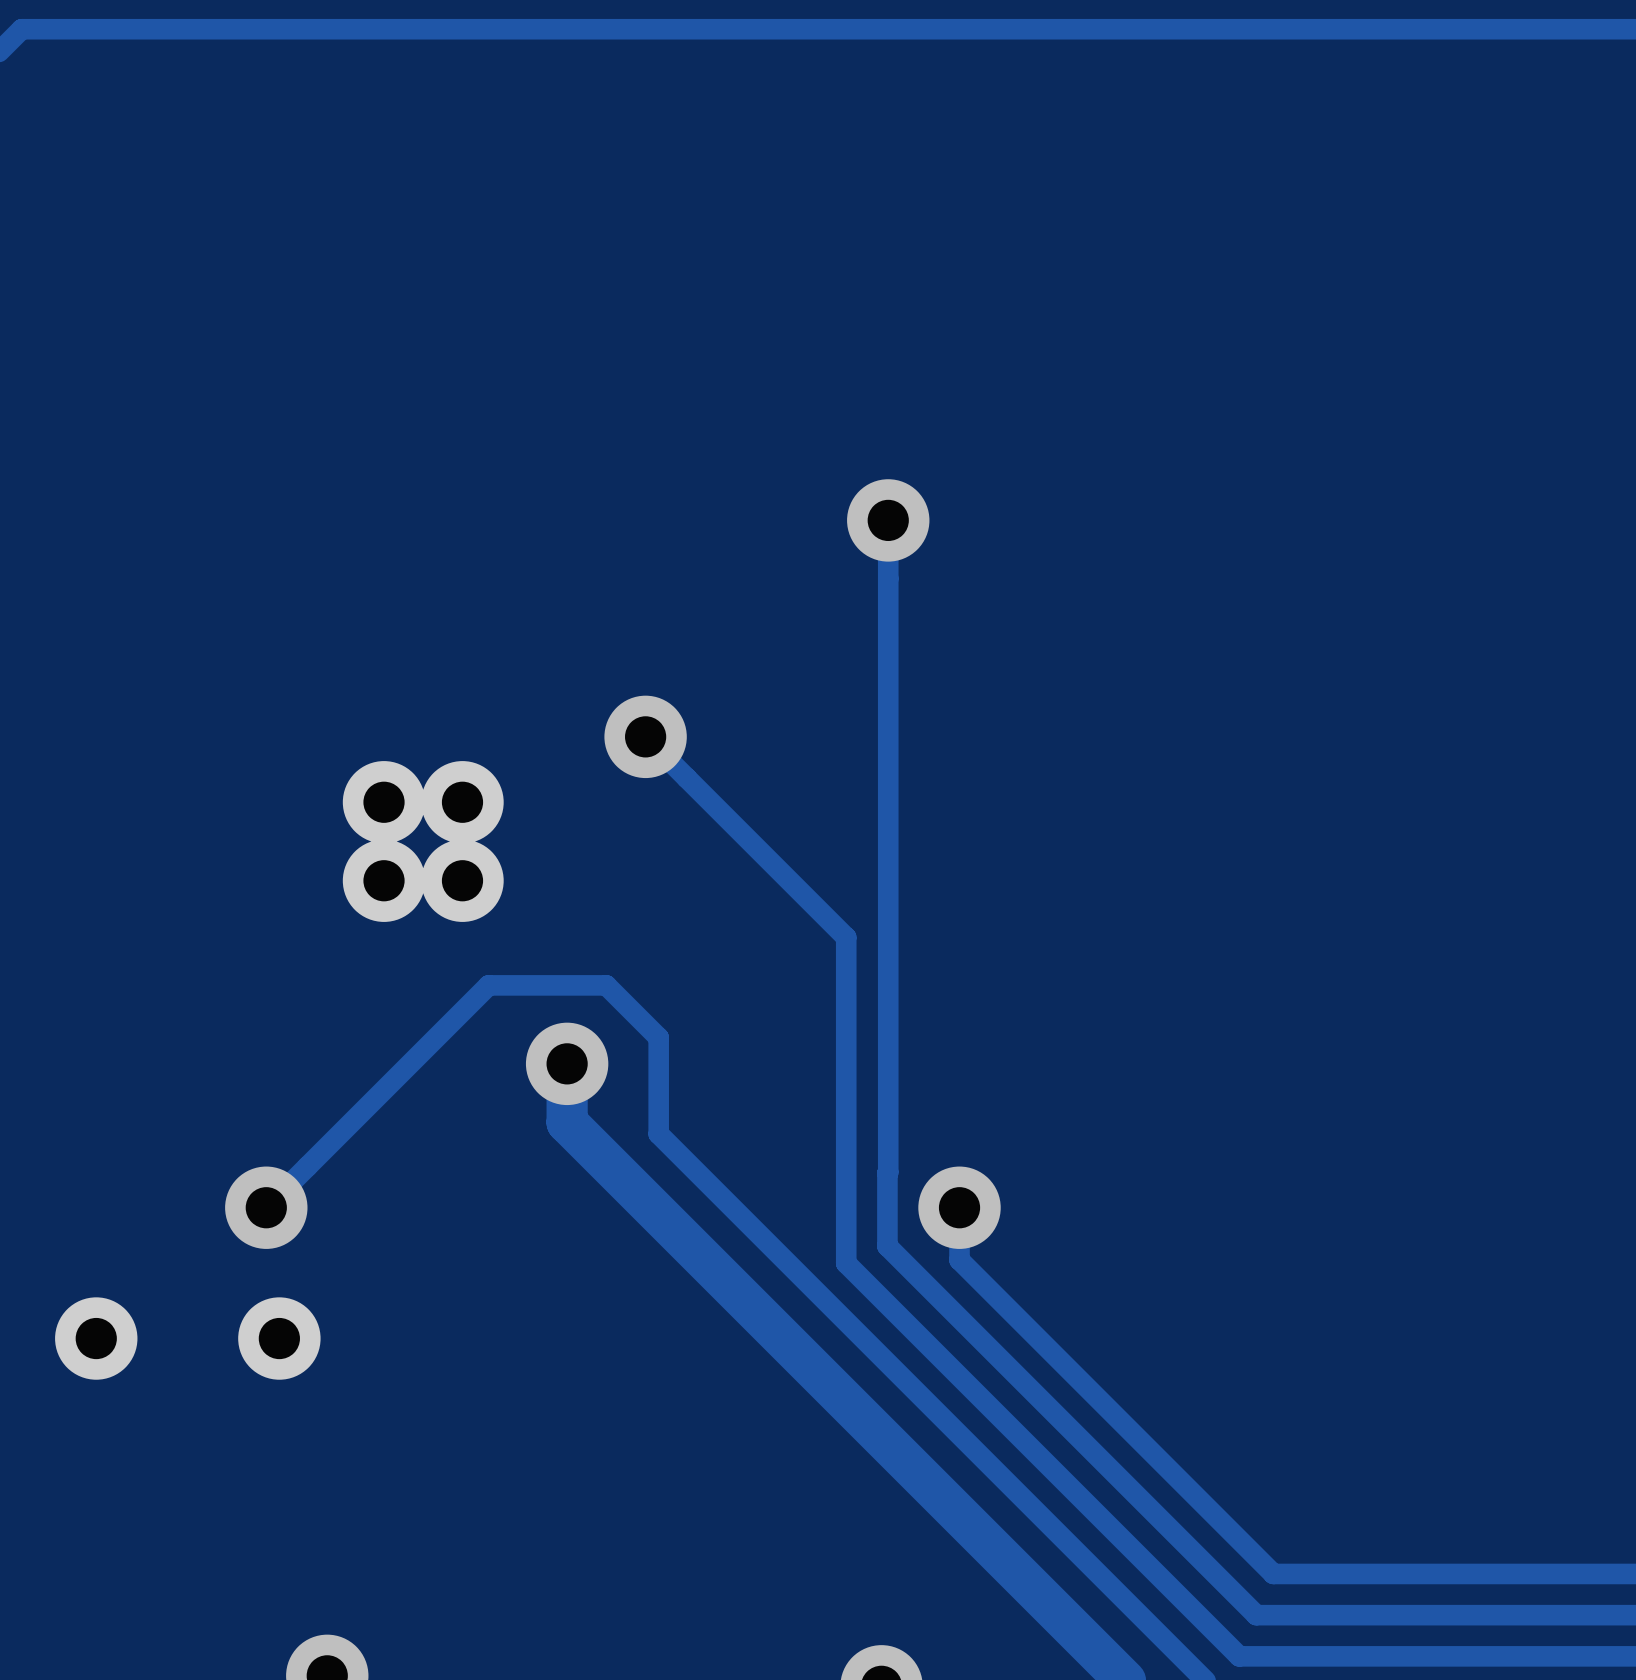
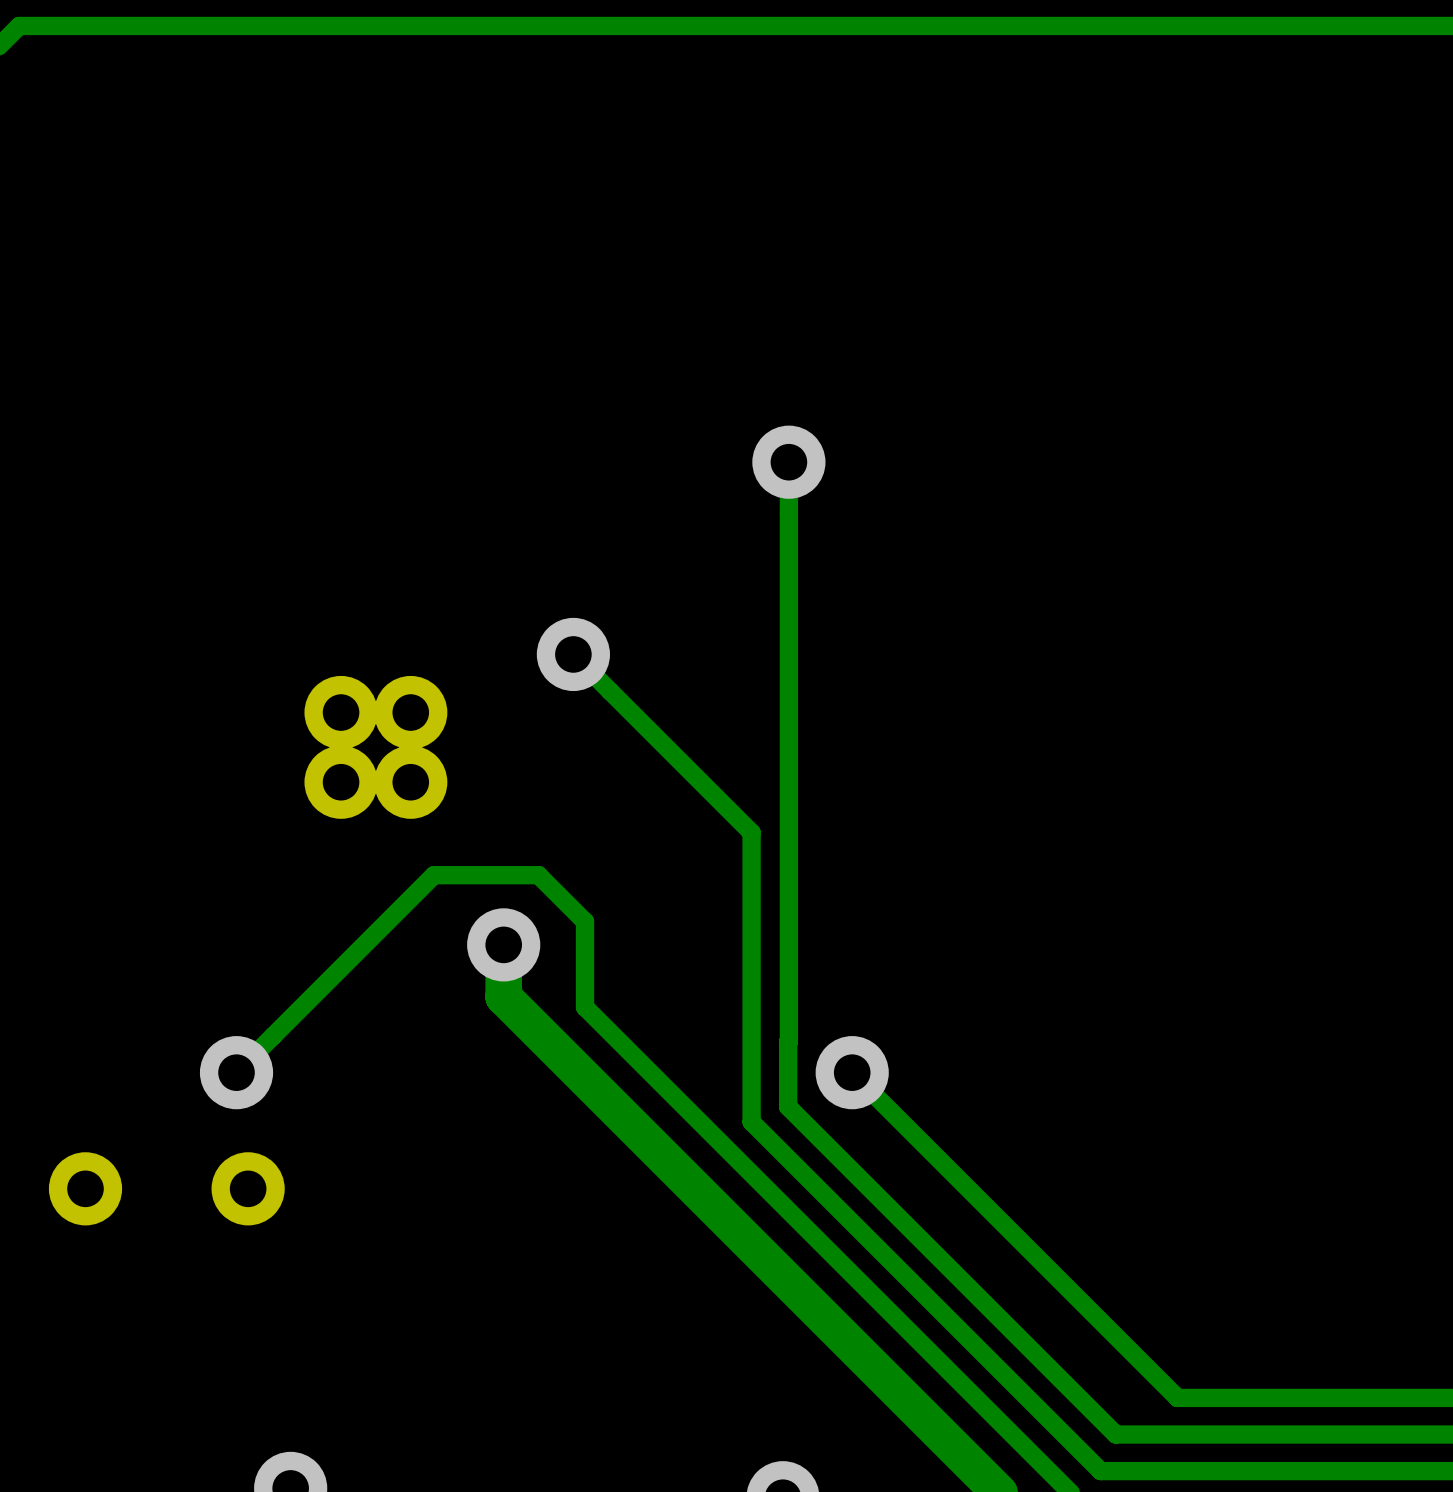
track: (959, 1207) (959, 1260) (1273, 1573) (1325, 1573) -> (852, 1072) (1177, 1397)

